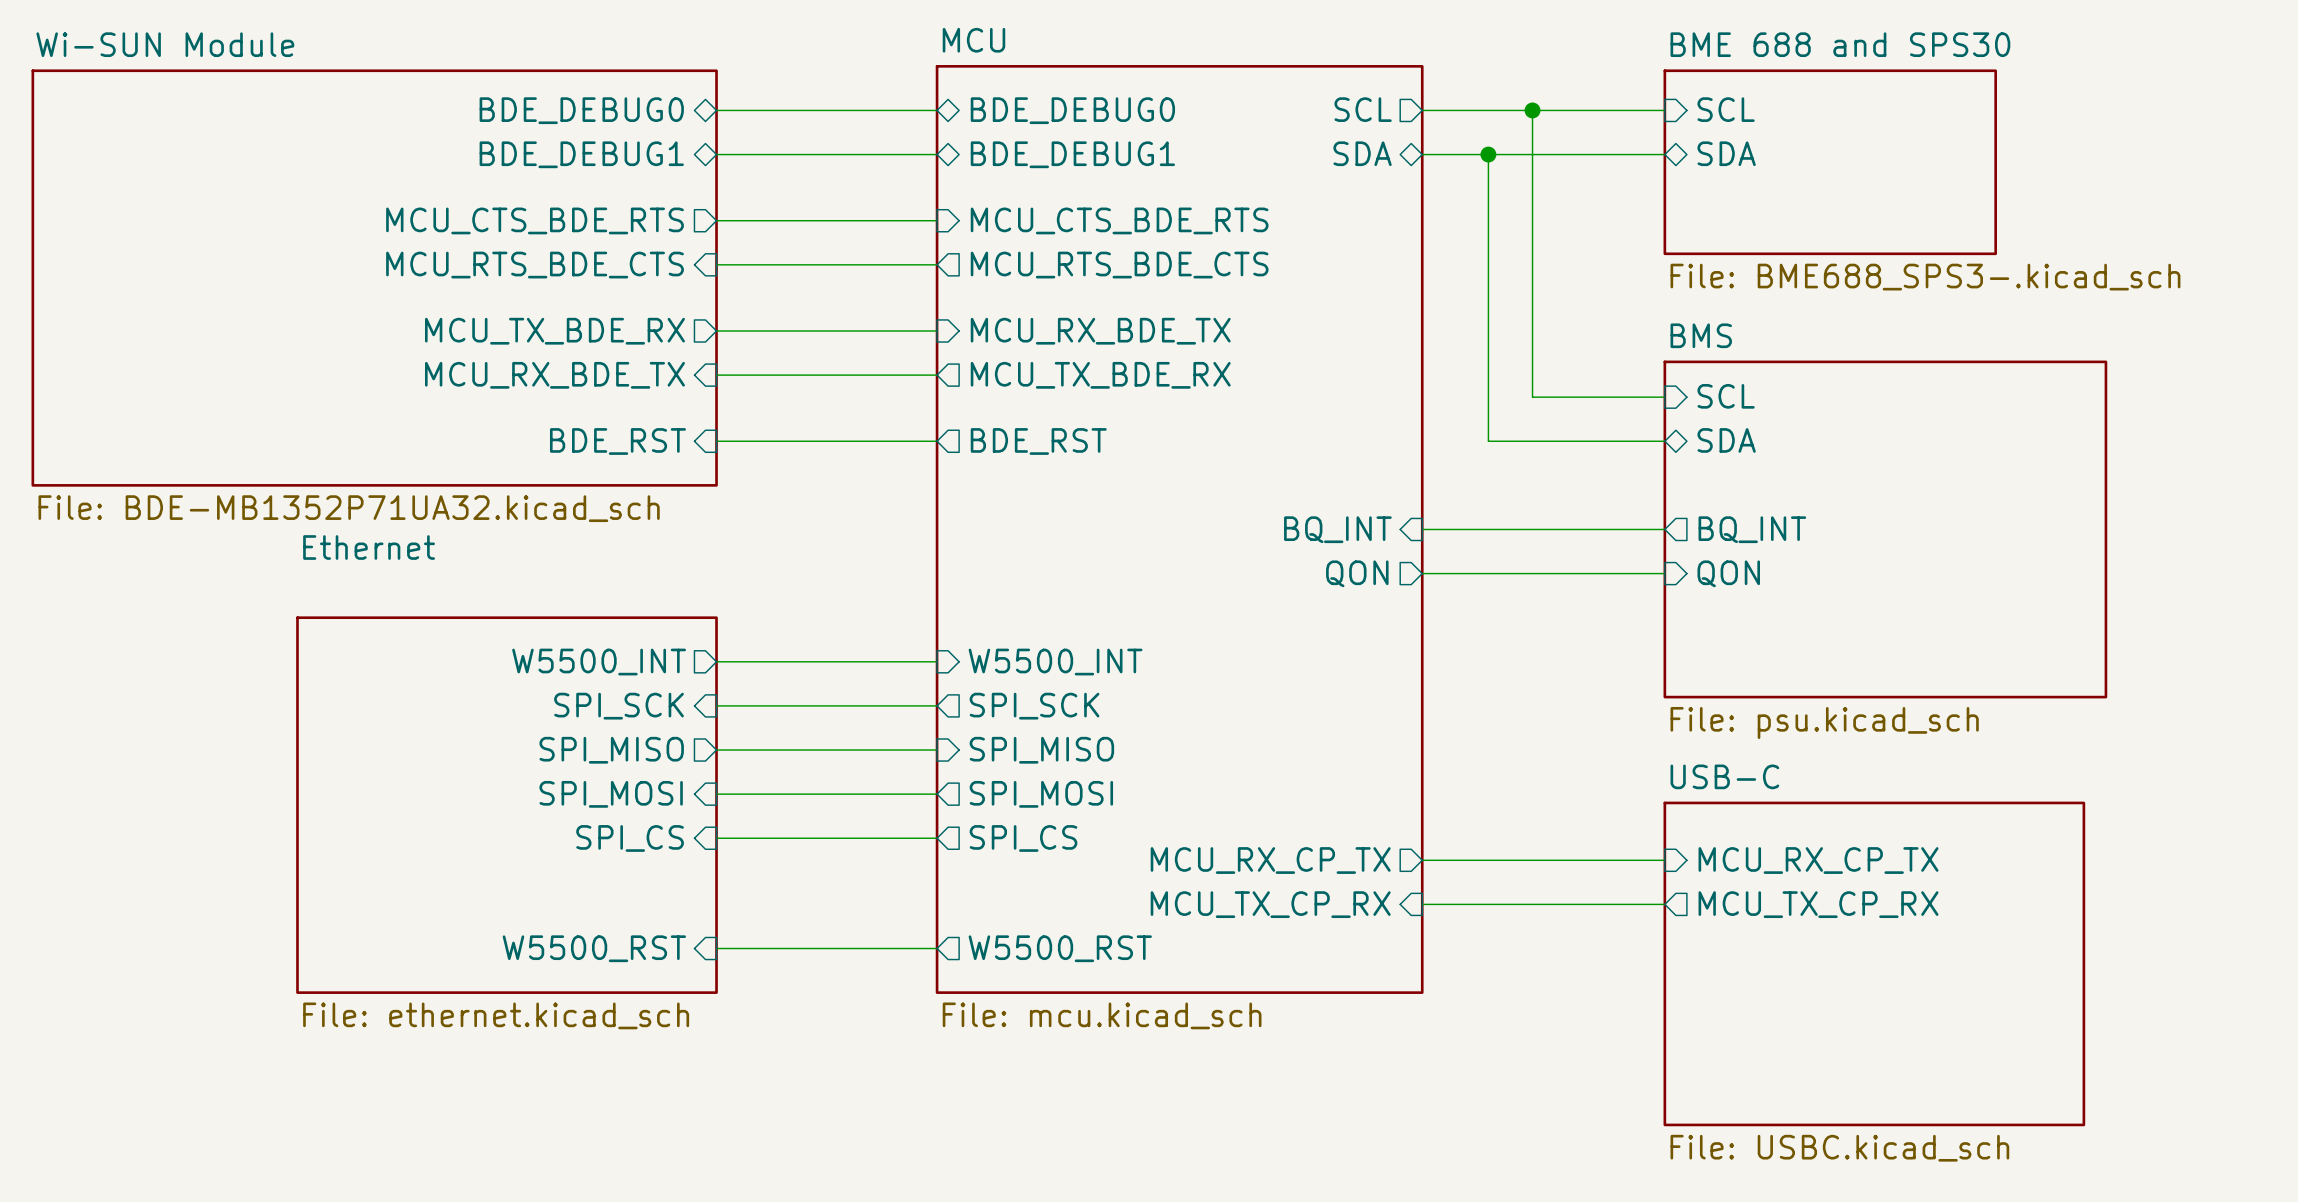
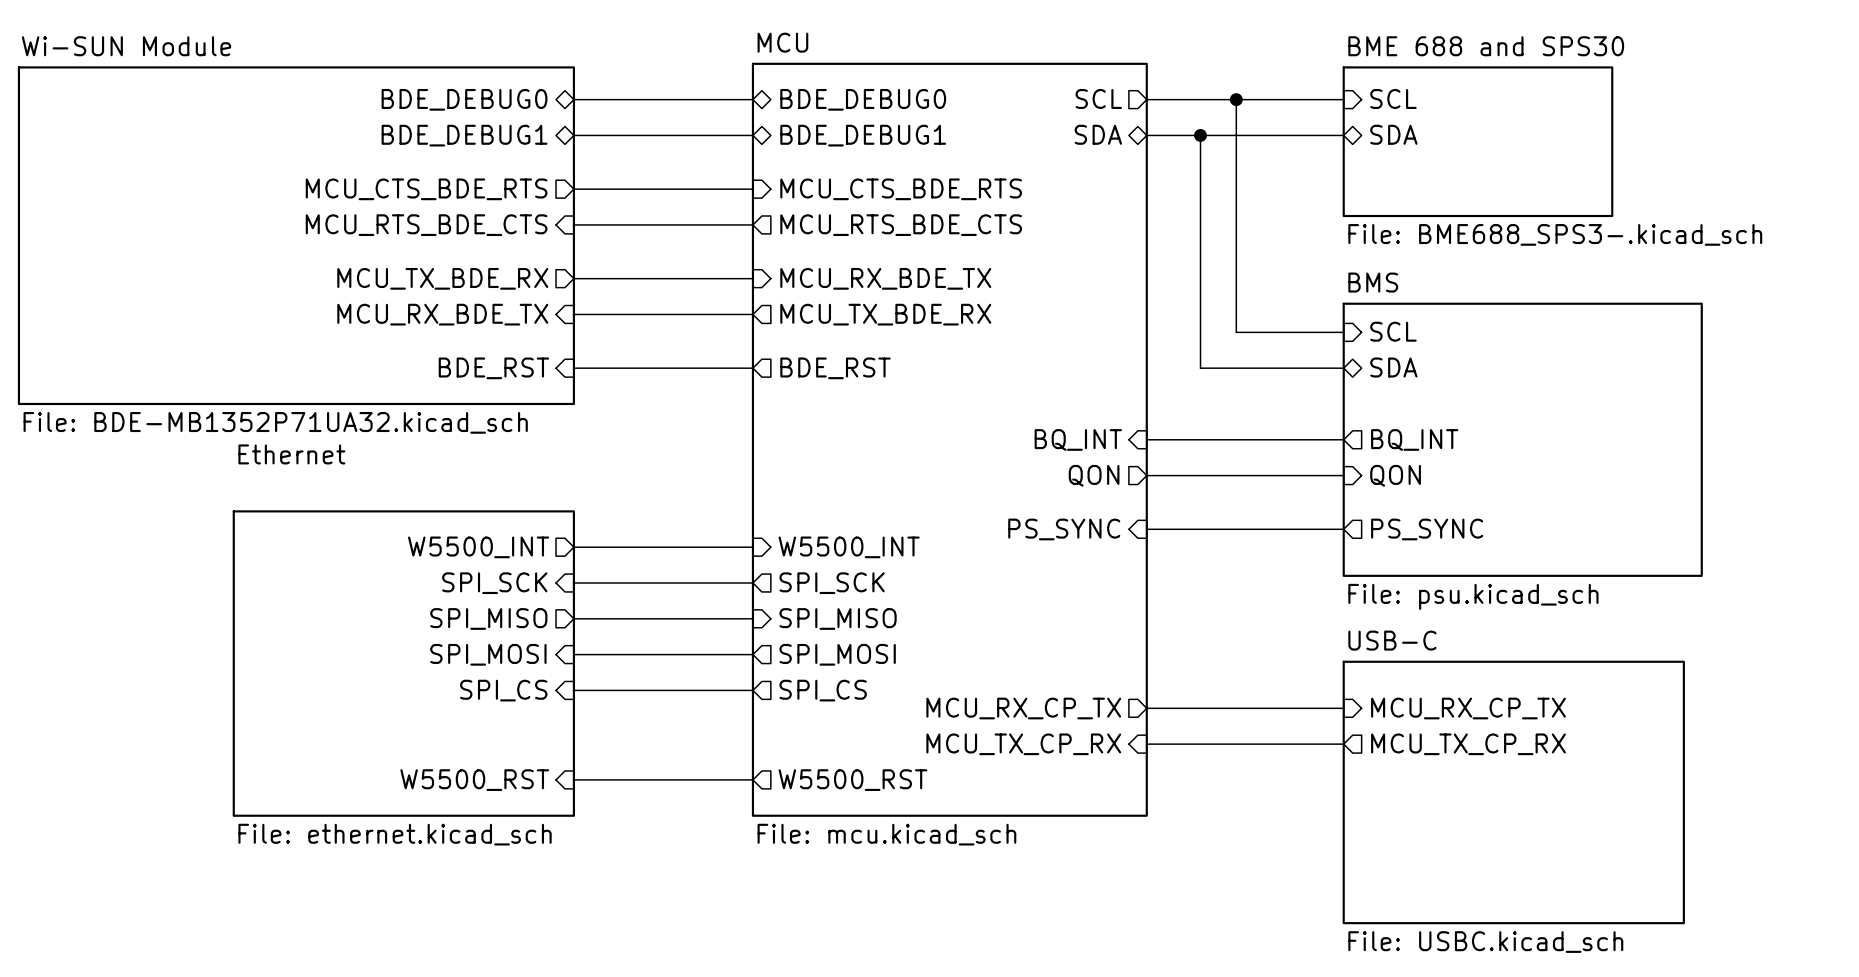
hierarchical label: none -> PS_SYNC (1064, 529)
wire: none -> (1146, 529) (1343, 529)
hierarchical label: none -> PS_SYNC (1427, 529)

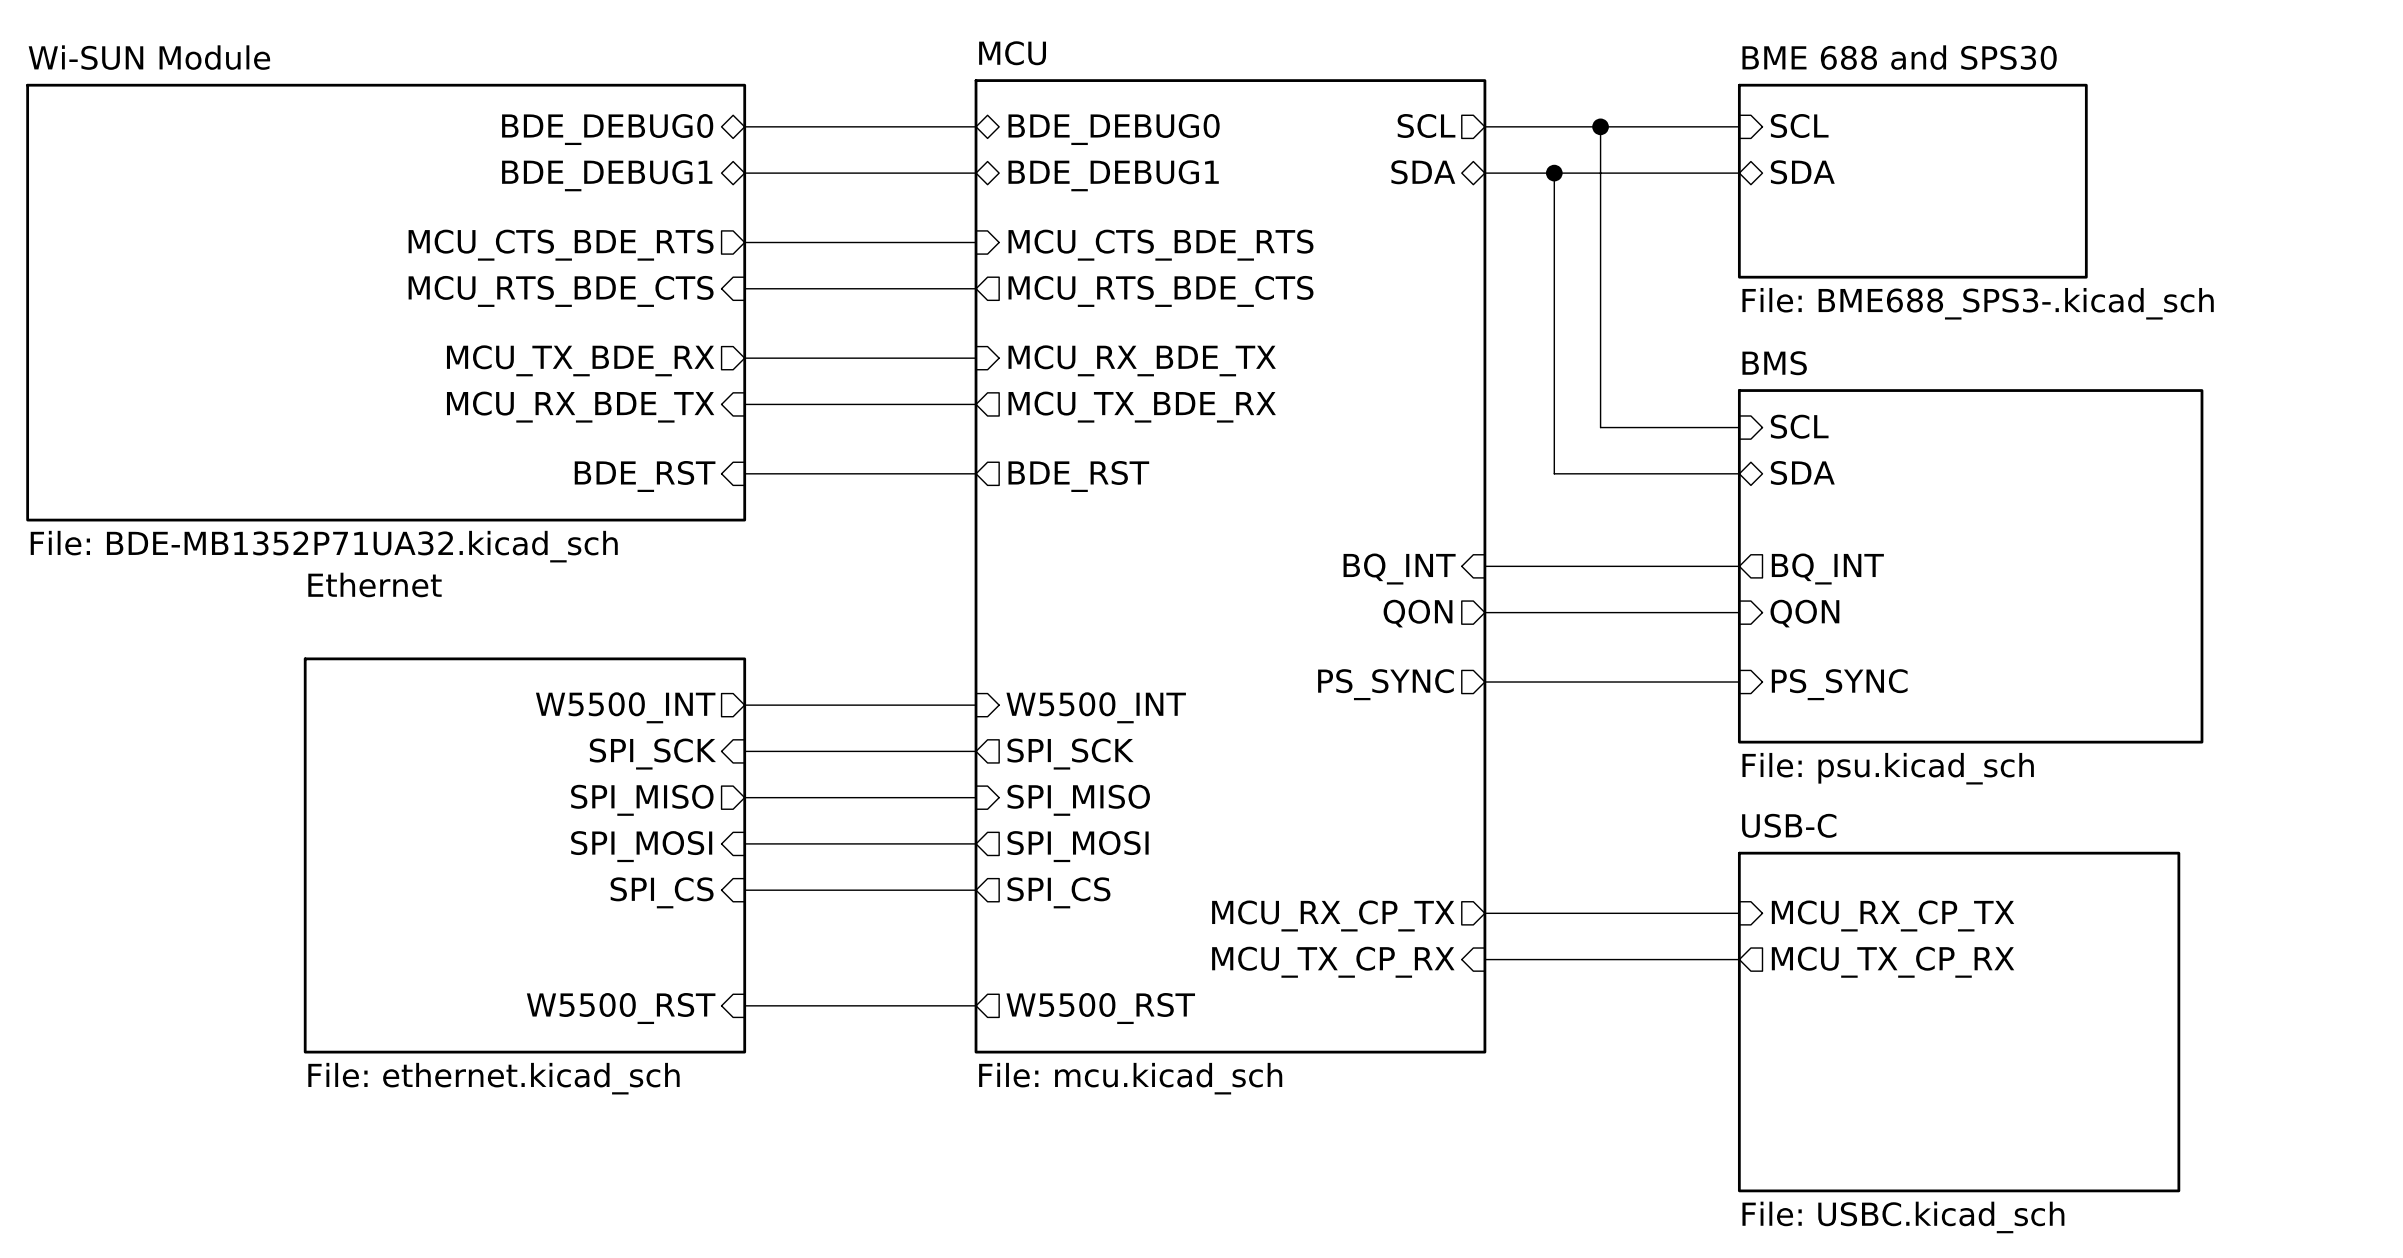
hierarchical label: PS_SYNC (1064, 529) -> none
sheet pin: none -> PS_SYNC (1385, 684)
hierarchical label: PS_SYNC (1427, 529) -> none
sheet pin: none -> PS_SYNC (1839, 684)

